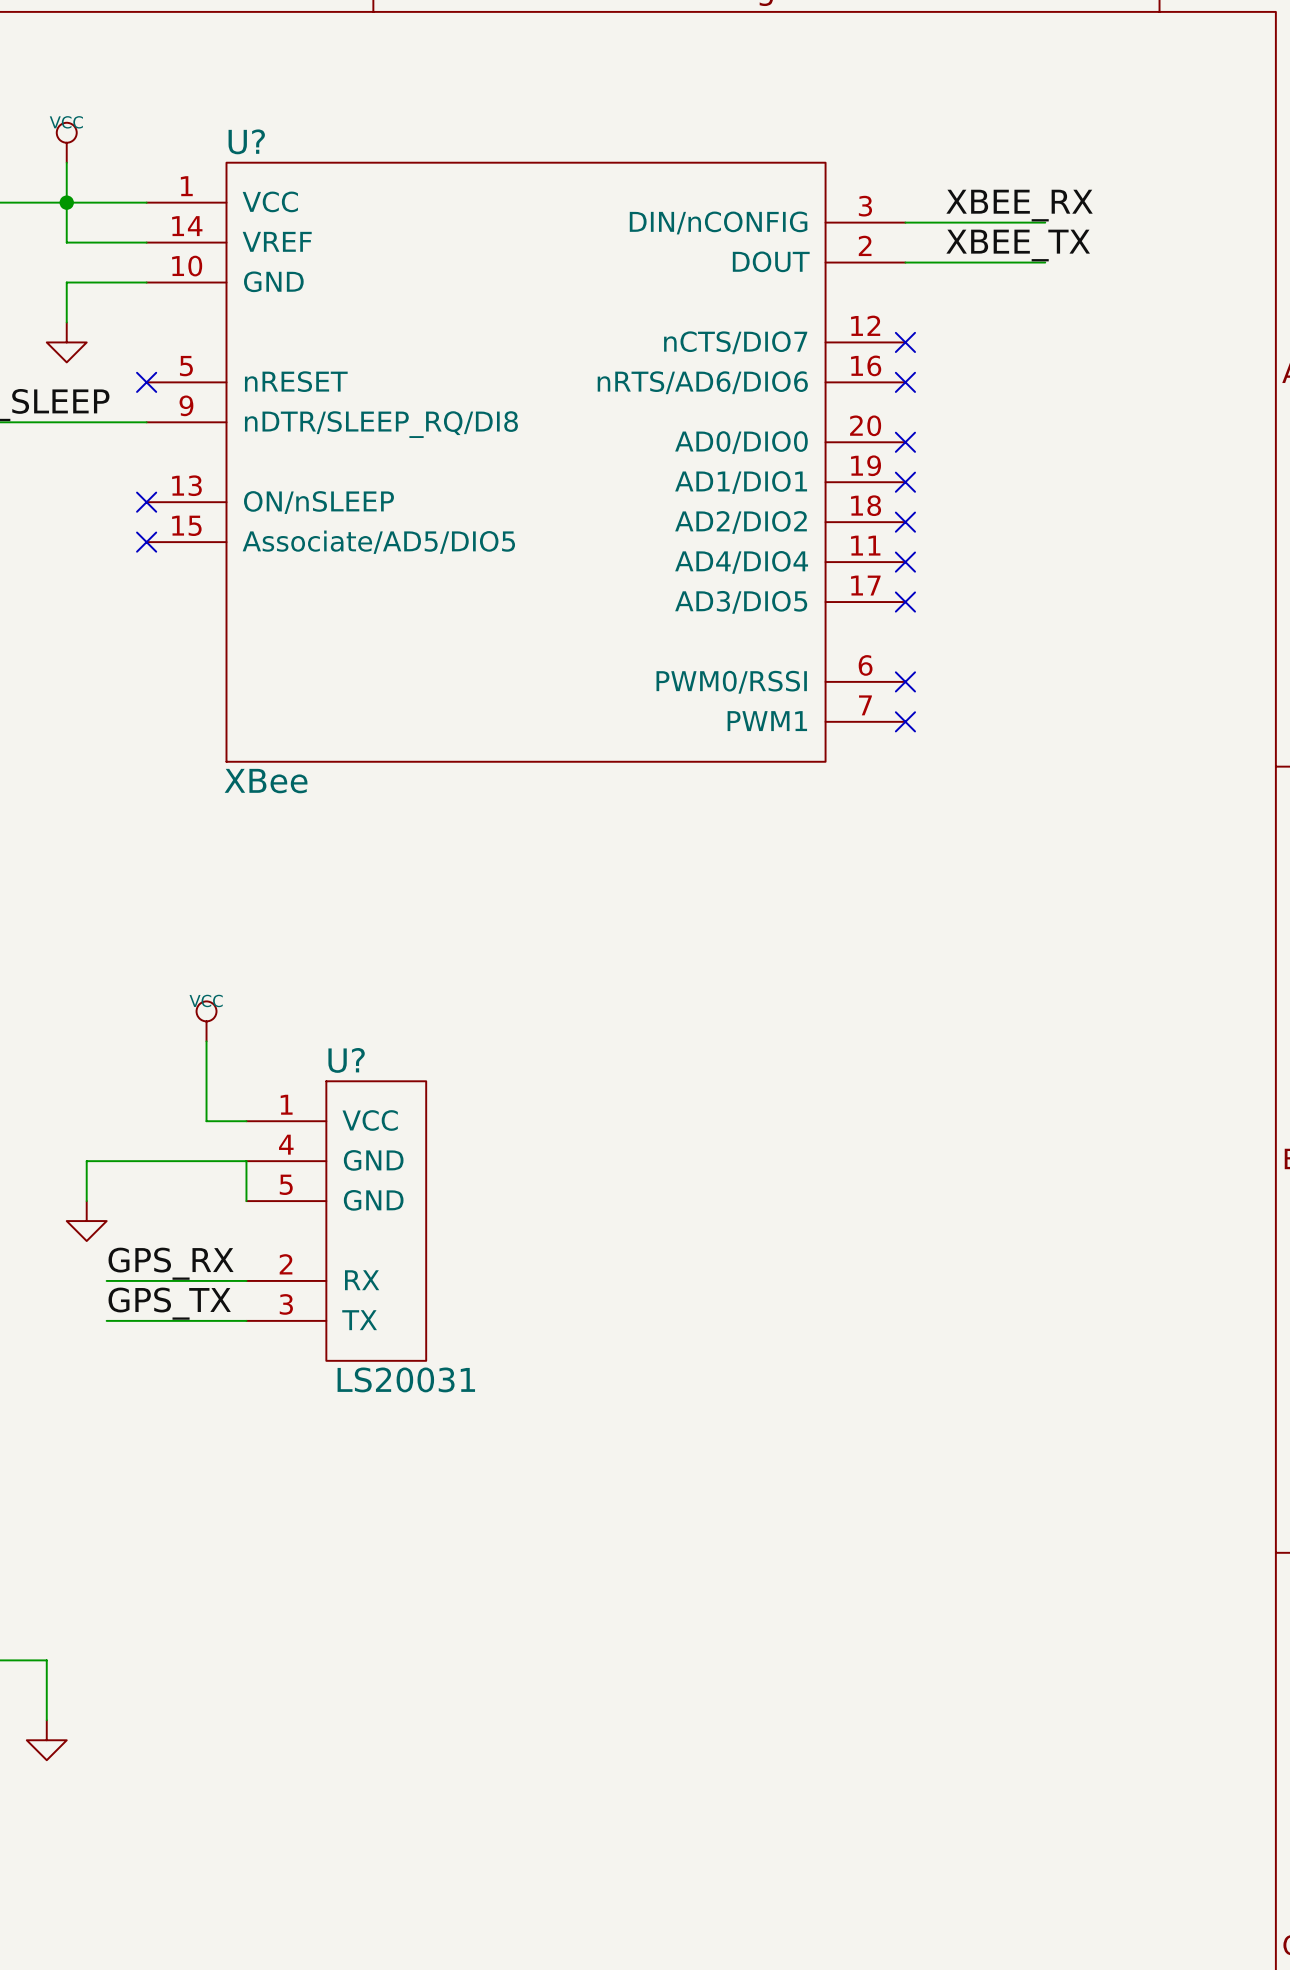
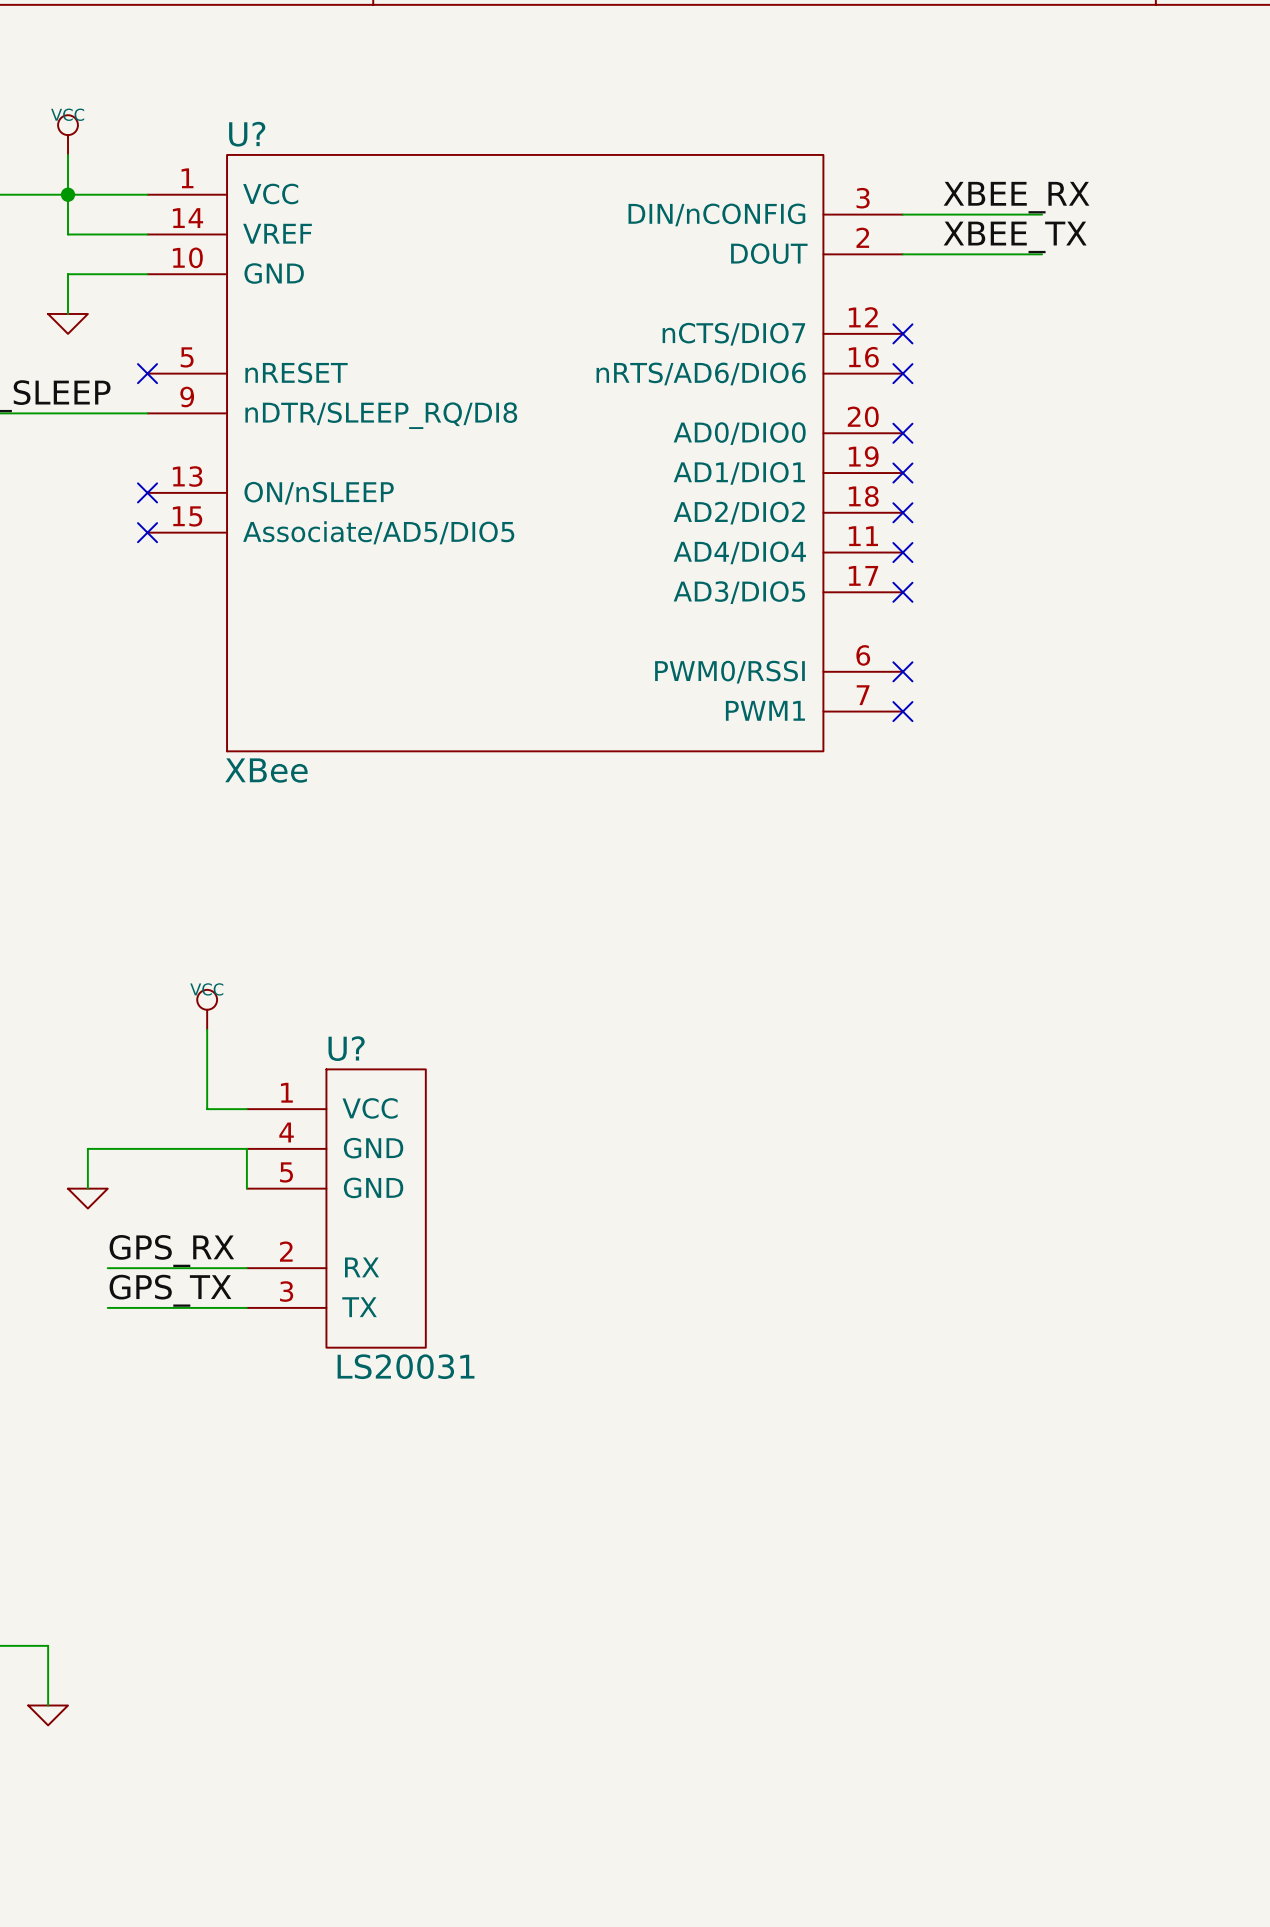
power symbol shape: [46, 322, 87, 363] -> [48, 313, 88, 334]
power symbol shape: [66, 1201, 107, 1242] -> [68, 1188, 108, 1209]
power symbol shape: [26, 1720, 67, 1761] -> [28, 1705, 69, 1726]

